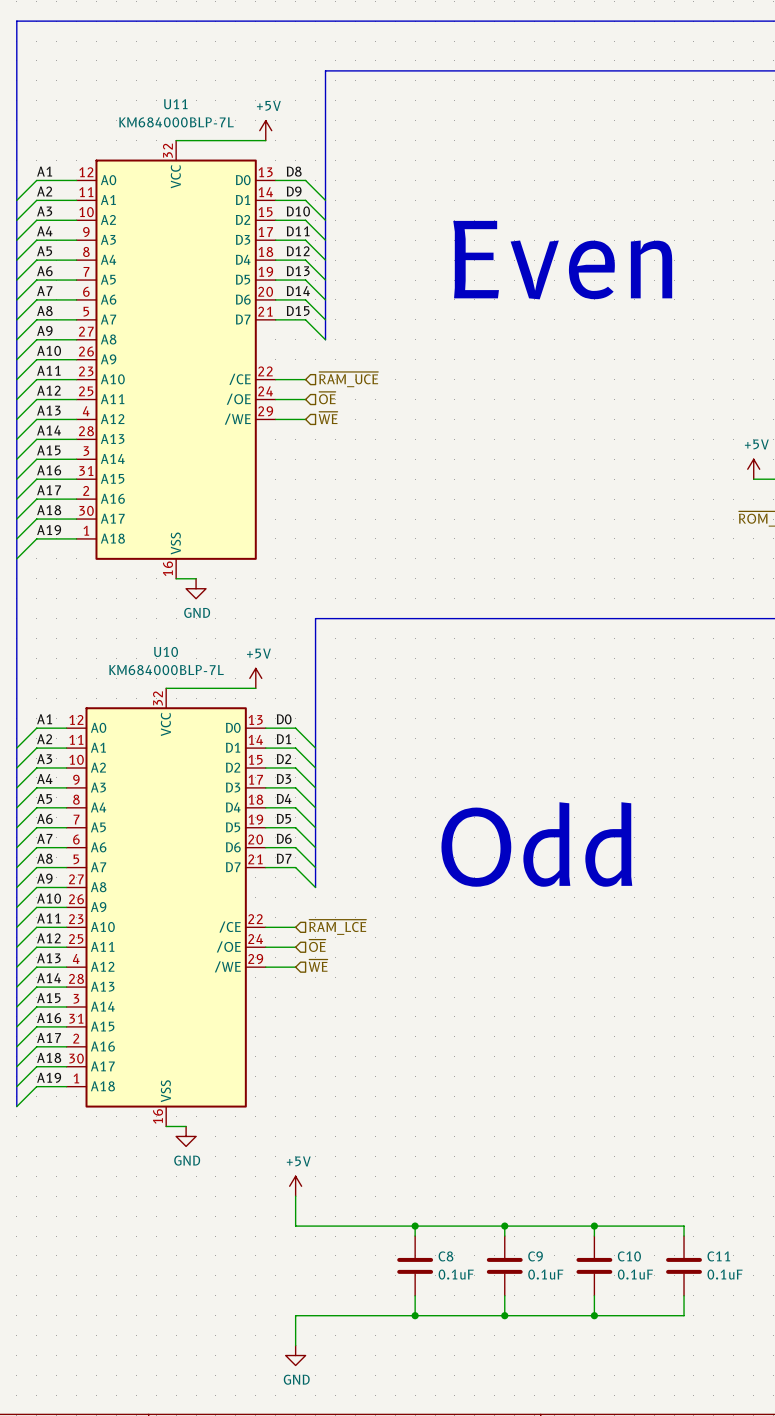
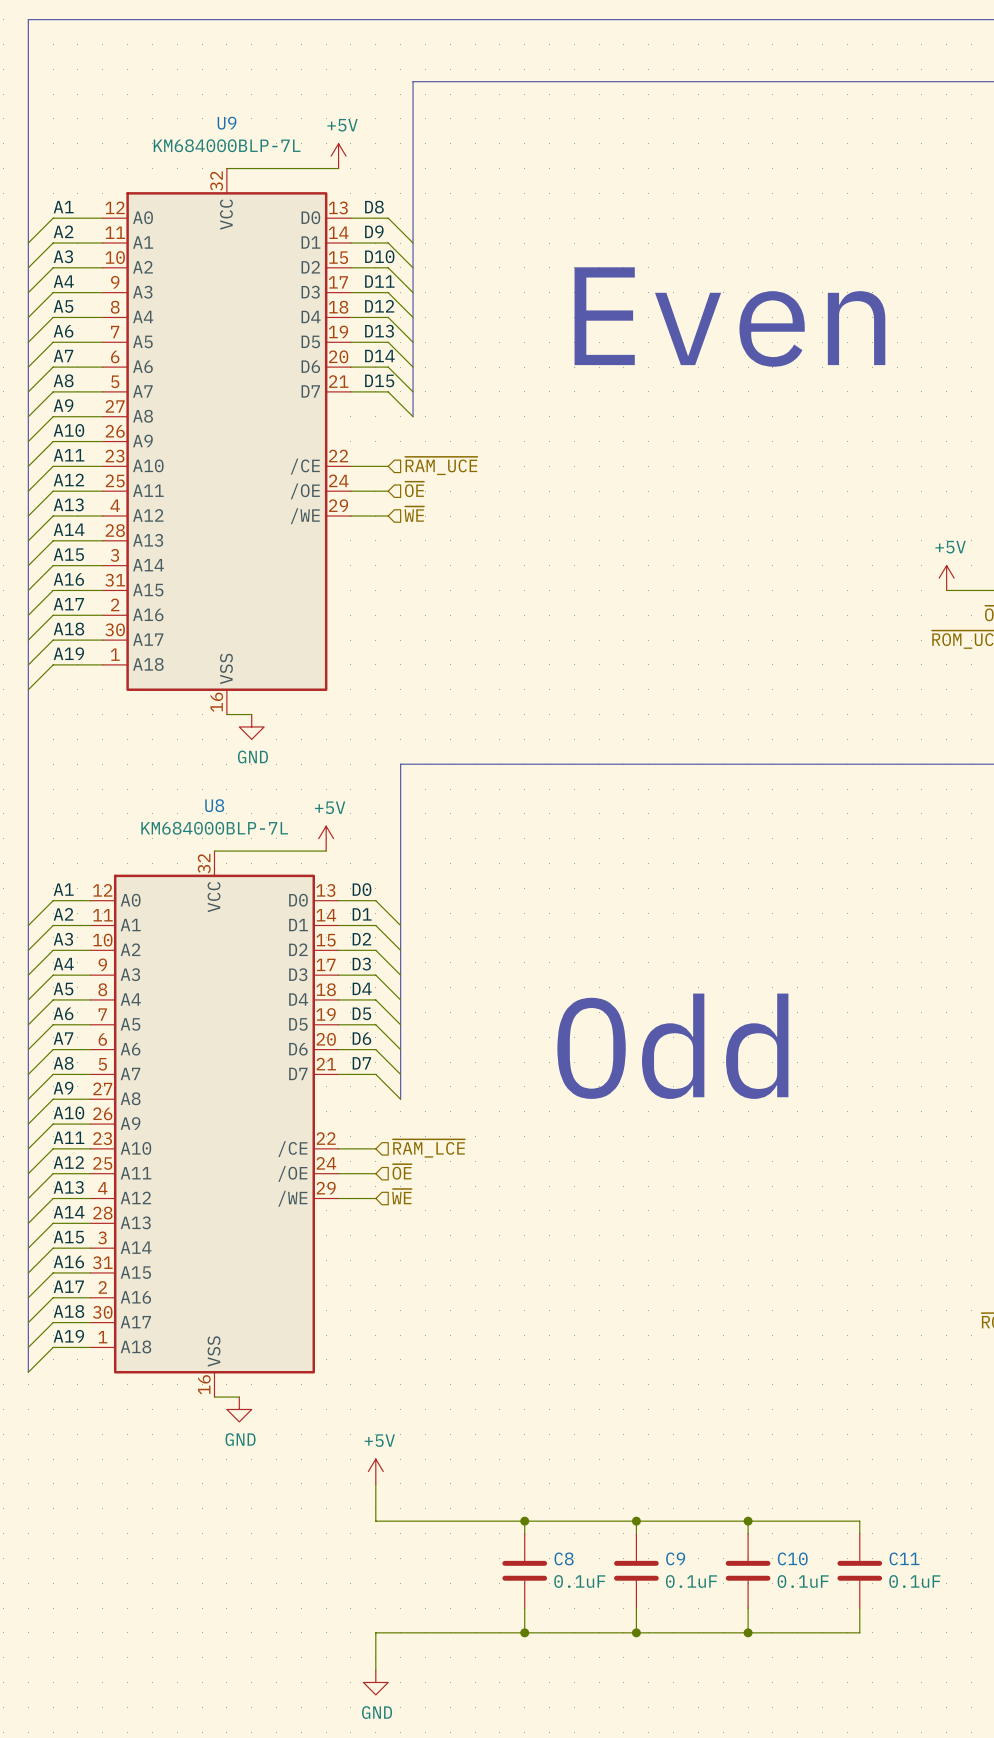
U11 name: U11 (175, 104) -> U9 (227, 123)
U10 name: U10 (166, 651) -> U8 (214, 805)

